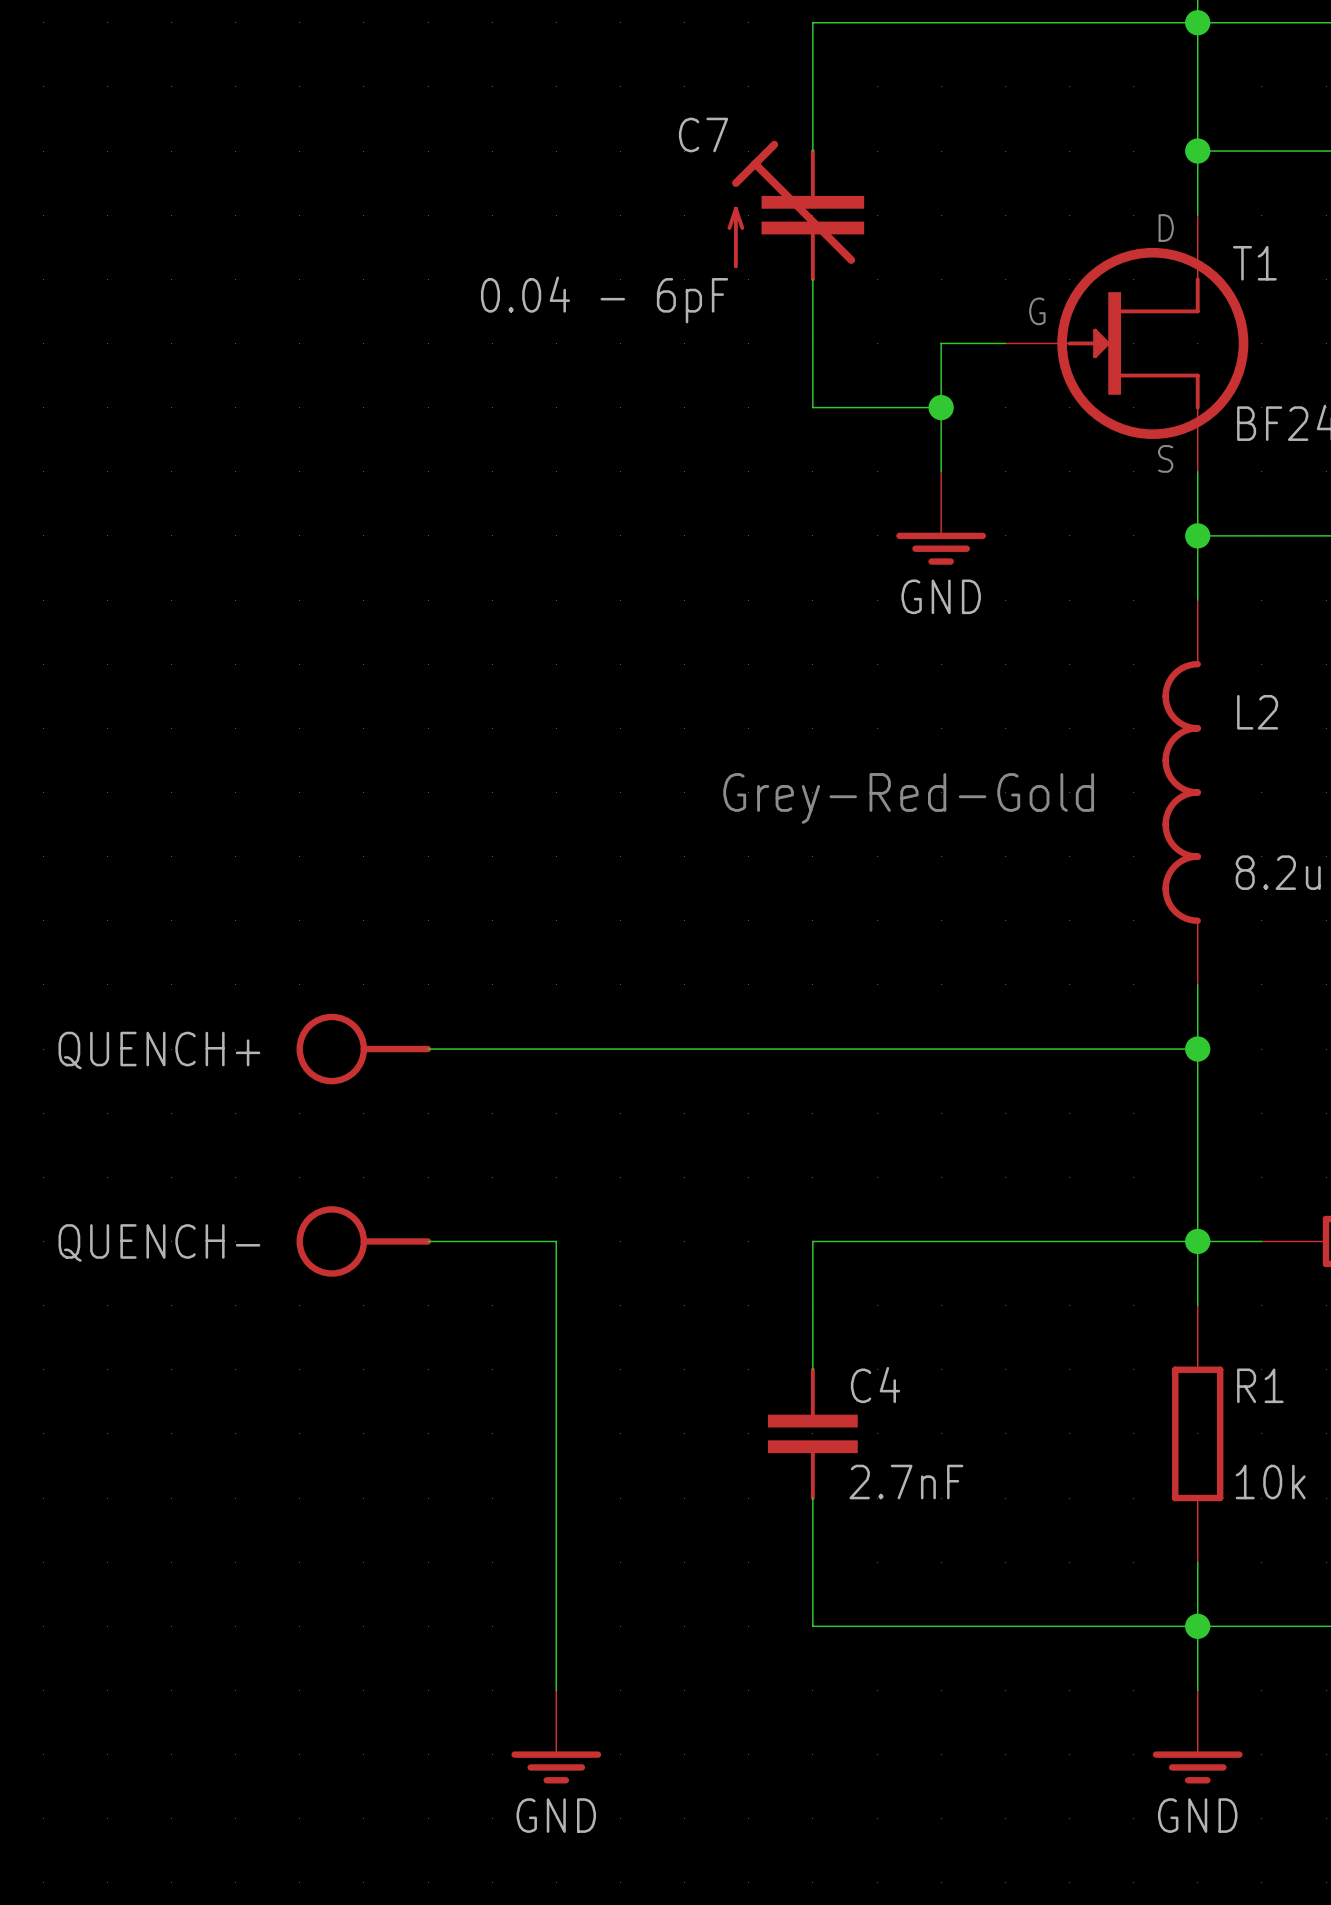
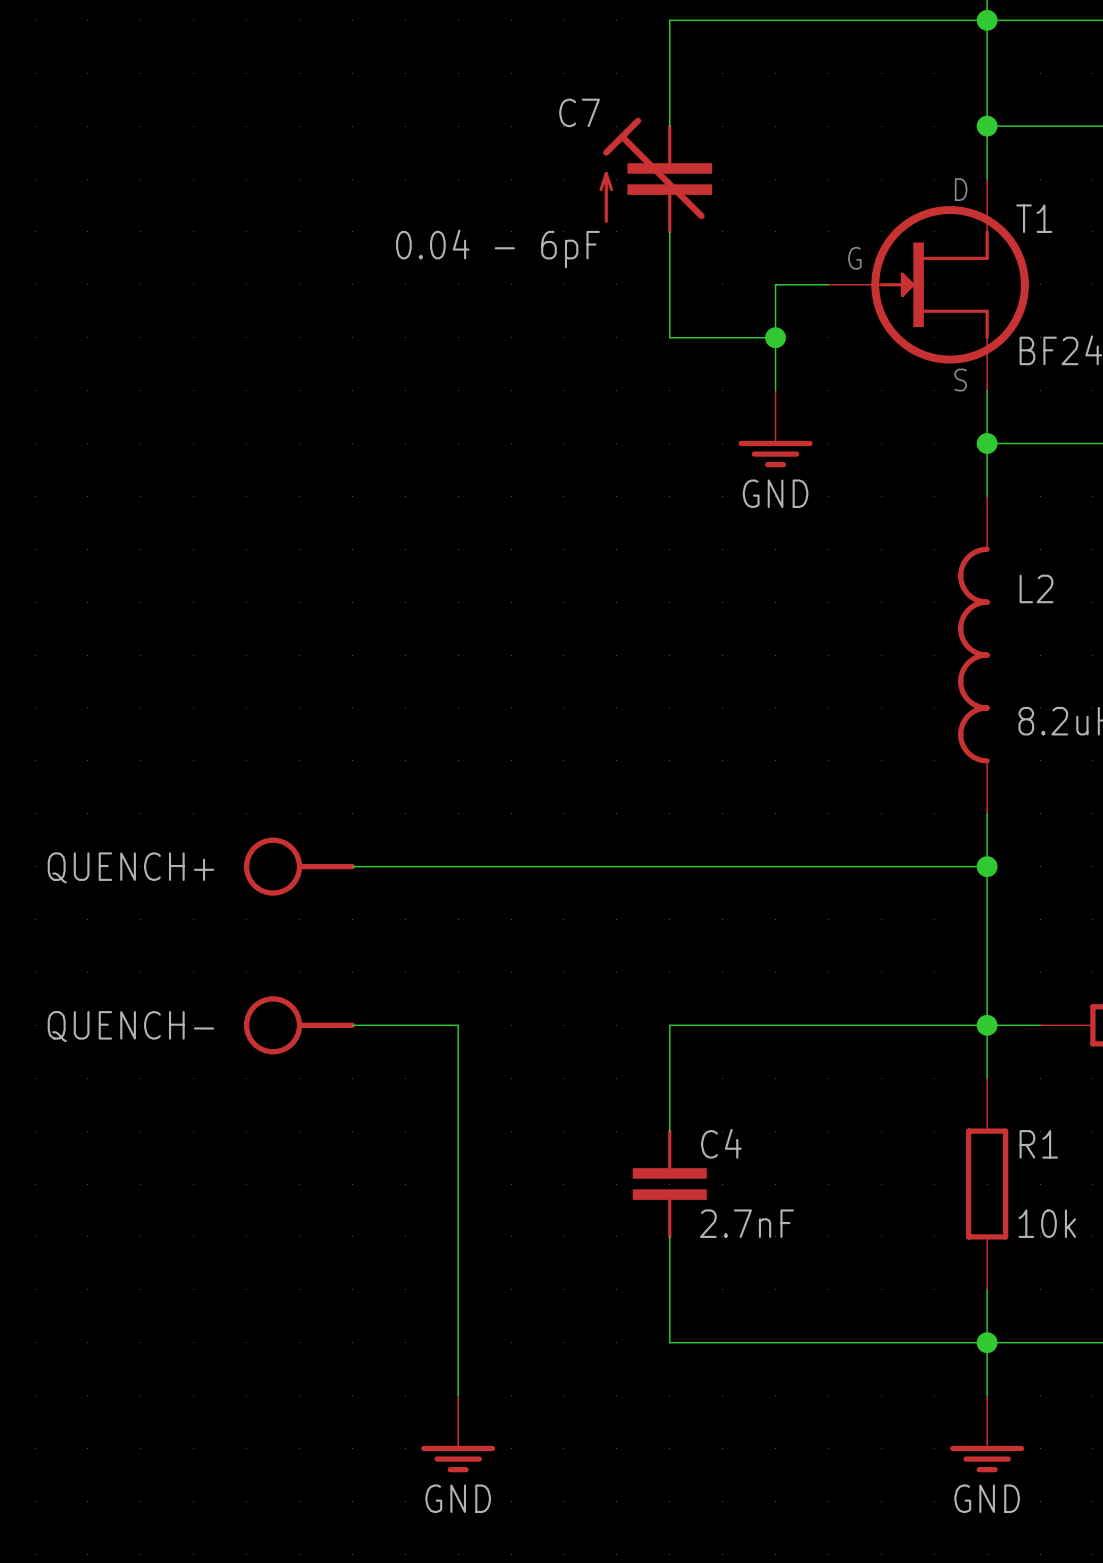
text: Grey-Red-Gold (908, 798) -> none

